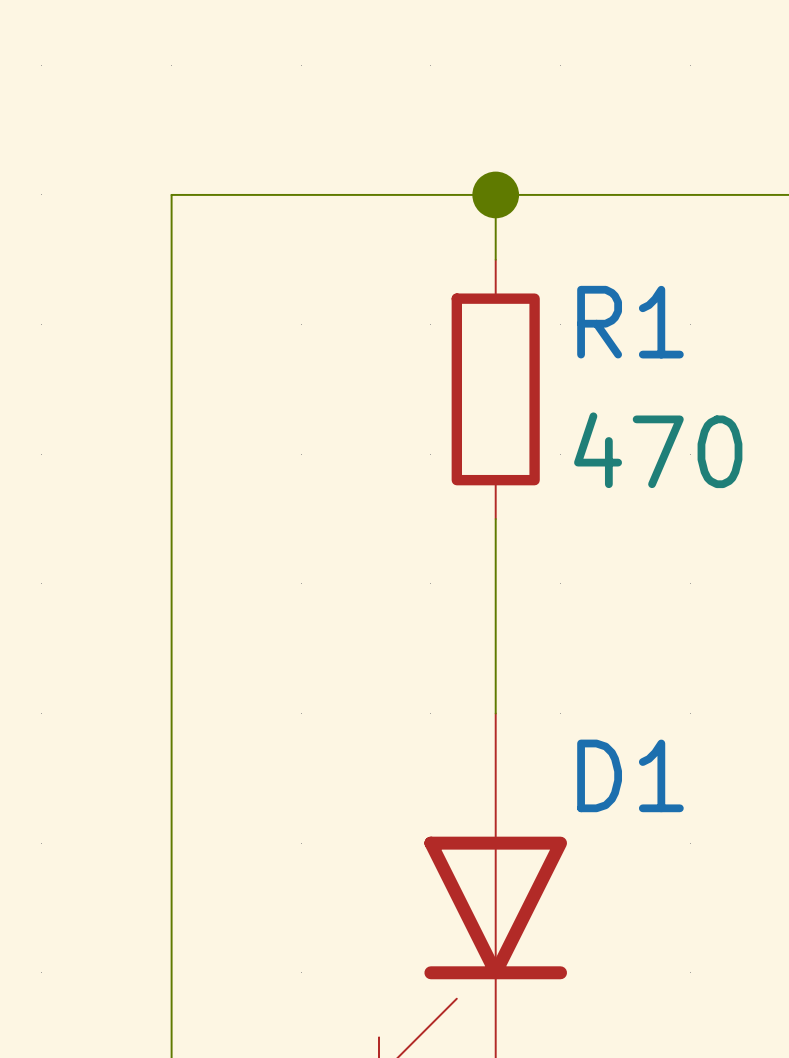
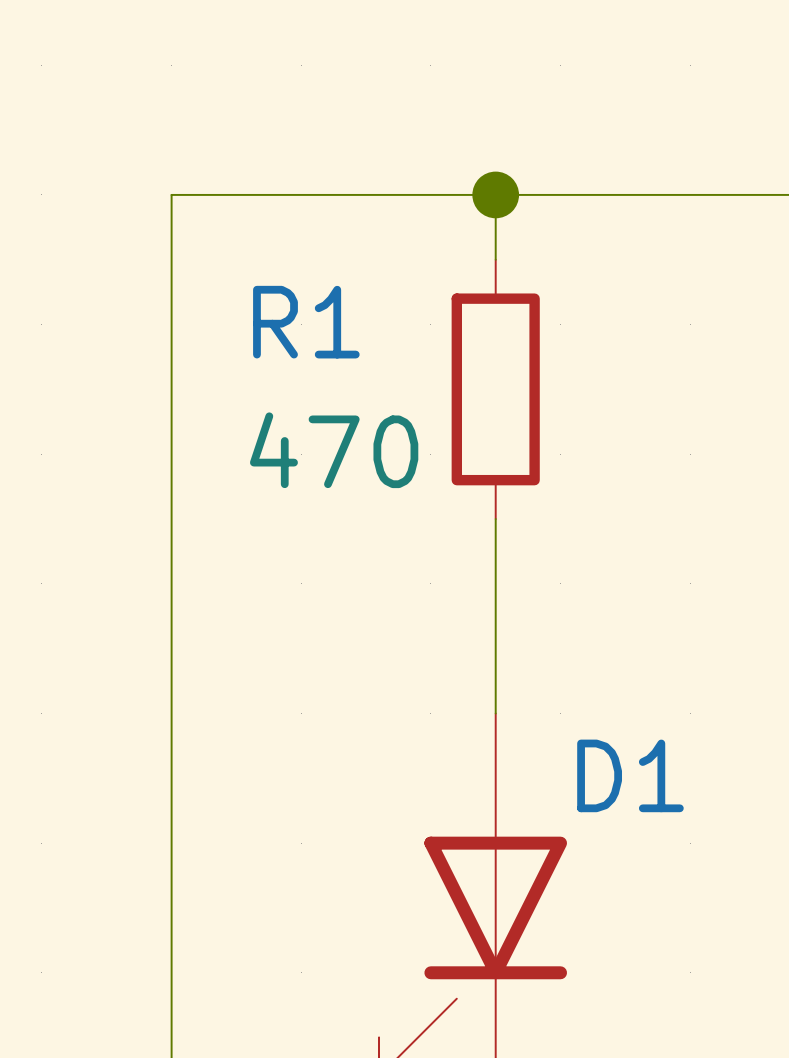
R1 name position: R1 (630, 322) -> R1 (306, 322)
R1 value position: 470 (658, 450) -> 470 (334, 450)

